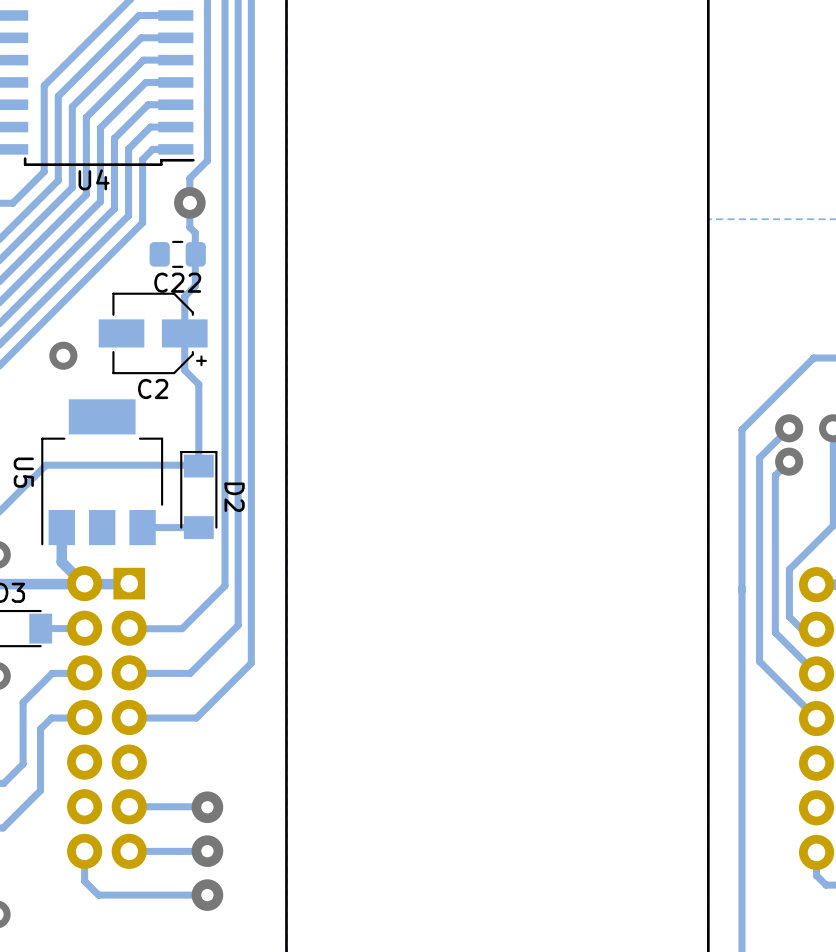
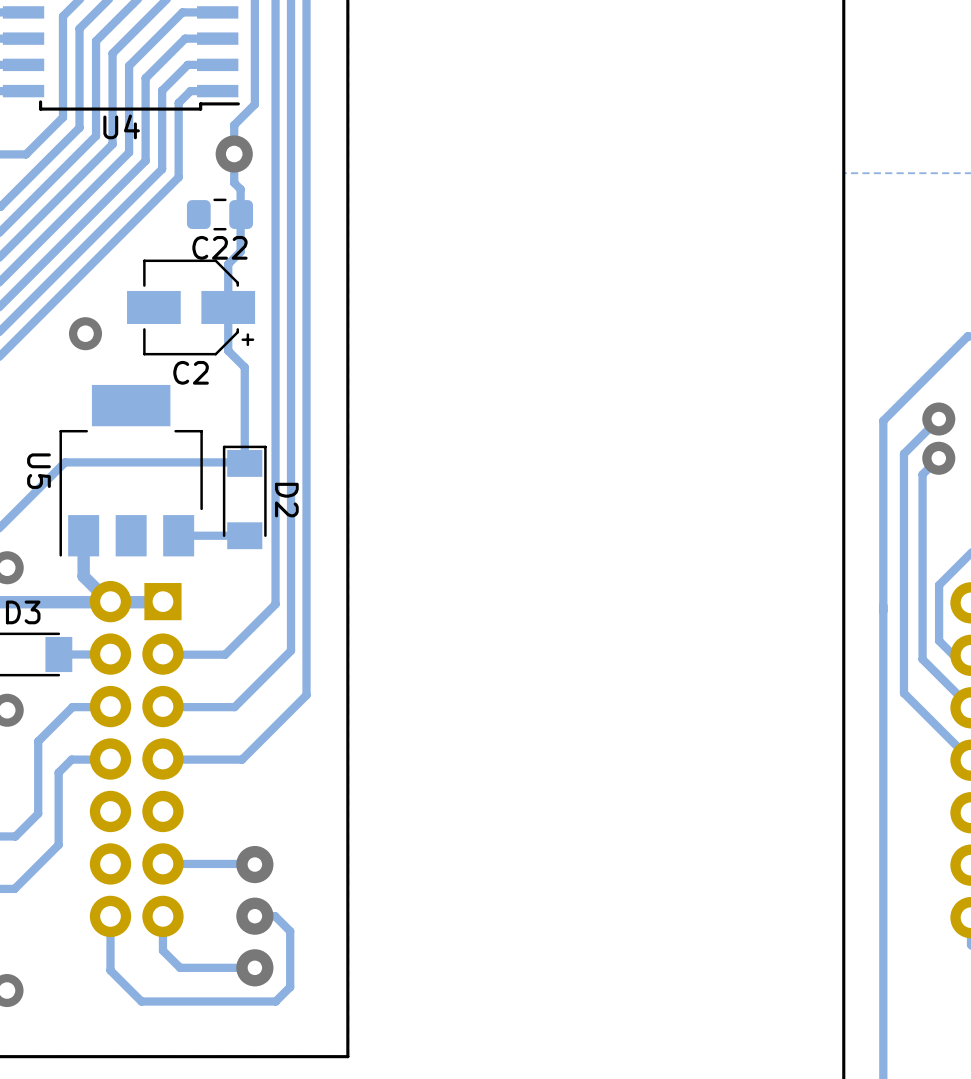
track: (207, 851) (129, 851) -> (254, 916) (275, 916) (290, 931) (290, 987) (275, 1001) (141, 1001) (110, 970) (110, 951)
track: (84, 881) (98, 895) (143, 895) -> (162, 916) (162, 950) (180, 967)

